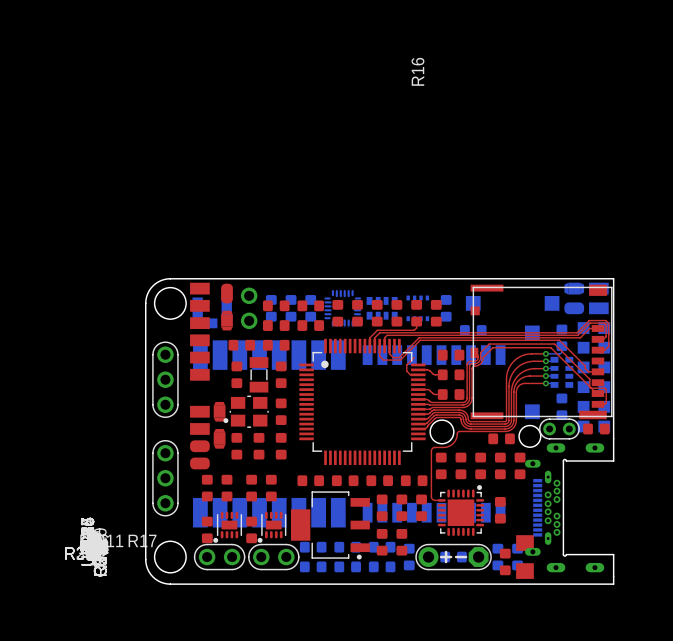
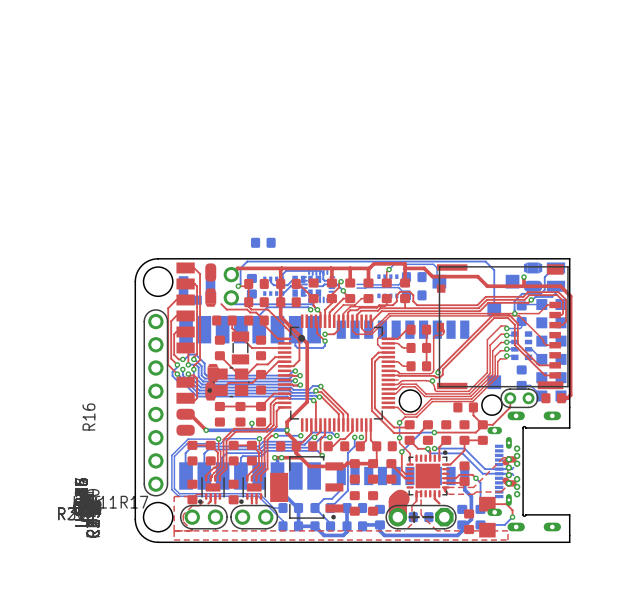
R16 name position: R16 (417, 71) -> R16 (88, 417)
top track: none -> (185, 267) (194, 267) (200, 273) (200, 360) (193, 366) (193, 369)
bottom track: none -> (555, 267) (544, 277) (544, 289) (540, 293) (522, 293) (514, 301) (514, 313)
top track: none -> (281, 268) (280, 316) (307, 343) (307, 401) (287, 422) (287, 433) (295, 441) (296, 446)
top track: none -> (331, 268) (331, 283)
top track: none -> (350, 268) (350, 283)
top track: none -> (369, 268) (237, 268) (229, 274)
top track: none -> (405, 268) (424, 268) (432, 276) (477, 276) (487, 286) (560, 286) (570, 296) (570, 395) (567, 398) (561, 398)
top track: none -> (389, 269) (386, 271) (386, 283)
bottom track: none -> (389, 269) (394, 264) (433, 264) (437, 267) (437, 279)
via: none -> (389, 269)
part footprint: [285, 295, 297, 322] -> [263, 276, 285, 296]
bottom track: none -> (406, 277) (398, 284) (357, 284)
part: none -> (414, 277)
top track: none -> (523, 277) (523, 286)
via: none -> (523, 277)
bottom track: none -> (270, 278) (273, 285) (287, 285) (295, 279)
bottom track: none -> (282, 278) (282, 274) (286, 270) (321, 270) (324, 280) (333, 281) (343, 290)
bottom track: none -> (310, 279) (310, 283) (313, 286) (329, 284)
top track: none -> (341, 281) (339, 287) (331, 294) (331, 303) (325, 310) (325, 321)
via: none -> (341, 281)
top track: none -> (368, 283) (368, 269) (373, 263) (405, 263) (405, 283)
top track: none -> (185, 283) (194, 283) (197, 286) (197, 354) (193, 359)
top track: none -> (296, 283) (299, 283) (313, 298) (313, 305) (320, 312) (320, 321)
top track: none -> (238, 286) (246, 286) (248, 283) (248, 306) (251, 309) (267, 309) (299, 341) (299, 360) (293, 366) (284, 366)
bottom track: none -> (238, 286) (240, 283) (240, 268) (247, 261) (485, 261) (494, 270) (494, 306)
via: none -> (238, 286)
part rotation: 0° (310, 308) -> 90° clockwise (263, 242)
part position: (310, 308) -> (263, 242)
part position: (382, 308) -> (306, 286)
part: (446, 308) -> none
bottom track: none -> (555, 286) (555, 293) (552, 296) (535, 296) (531, 299)
bottom track: none -> (357, 288) (398, 287) (406, 295)
top track: none -> (343, 290) (350, 298) (343, 298) (329, 312) (329, 321)
via: none -> (343, 290)
bottom track: none -> (303, 293) (303, 289) (299, 286) (290, 286) (282, 293)
part: none -> (414, 295)
bottom track: none -> (229, 297) (235, 304) (312, 304) (317, 309)
top track: none -> (368, 298) (361, 298) (355, 305) (343, 305)
top track: none -> (405, 298) (405, 308)
top track: none -> (185, 299) (176, 299) (168, 308) (168, 364) (177, 374)
top track: none -> (531, 299) (528, 302) (488, 302) (479, 311) (381, 311) (370, 321)
via: none -> (531, 299)
top track: none -> (221, 304) (226, 309) (247, 309) (250, 312) (256, 312) (264, 320) (264, 325) (277, 338) (284, 338)
top track: none -> (343, 305) (334, 314)
bottom track: none -> (541, 304) (521, 305)
part: (473, 330) -> none
bottom track: none -> (310, 309) (308, 307) (267, 307) (259, 315) (259, 329)
via: none -> (310, 309)
via: none -> (317, 309)
top track: (374, 337) (379, 332) (577, 332) (589, 320) (605, 320) (608, 323) (608, 346) (605, 350) -> (347, 313) (350, 310) (357, 310) (359, 307) (392, 305) (396, 301) (396, 295) (400, 291) (410, 291) (413, 295) (413, 301) (417, 305) (477, 305) (485, 296) (523, 296) (528, 292) (558, 292) (566, 299) (566, 321) (561, 325)
via: none -> (514, 313)
top track: (384, 339) (387, 335) (578, 335) (590, 323) (604, 323) (606, 336) (603, 339) -> (357, 314) (361, 310) (377, 310) (380, 308) (478, 308) (487, 299) (524, 299) (529, 295) (557, 295) (563, 300) (563, 313) (560, 315)
top track: none -> (185, 315) (176, 315) (171, 321) (171, 358) (177, 364)
top track: none -> (232, 320) (232, 328) (251, 347) (284, 347)
top track: none -> (315, 321) (317, 333) (325, 341)
top track: none -> (338, 321) (338, 329) (334, 334) (325, 334)
top track: (545, 353) (521, 355) (509, 366) (506, 375) (506, 420) (504, 421) -> (506, 326) (501, 326) (487, 339) (487, 372) (468, 391)
bottom track: none -> (295, 329) (295, 345) (297, 347) (322, 347) (325, 341)
top track: none -> (411, 329) (406, 329) (397, 338) (388, 338)
top track: none -> (426, 329) (426, 366)
top track: none -> (185, 331) (176, 331) (174, 334) (174, 354) (178, 359) (182, 359)
via: none -> (325, 334)
top track: (545, 361) (524, 363) (512, 373) (509, 383) (508, 420) (506, 423) (469, 423) (463, 414) (459, 412) (435, 412) (425, 419) -> (506, 334) (501, 334) (490, 345) (490, 373) (469, 393) (425, 393) (416, 384) (401, 384) (395, 389)
via: none -> (325, 341)
top track: (545, 368) (525, 370) (514, 380) (511, 388) (511, 421) (507, 426) (468, 426) (459, 415) (435, 415) (424, 424) -> (506, 342) (501, 342) (492, 350) (492, 374) (470, 396) (424, 396) (415, 386) (402, 386) (393, 393)
top track: none -> (185, 347) (188, 350) (188, 364)
top track: (545, 376) (525, 376) (517, 382) (514, 389) (513, 421) (508, 428) (469, 428) (462, 425) (459, 417) (437, 417) (425, 428) (418, 428) -> none
bottom track: none -> (528, 349) (531, 349) (541, 359)
top track: none -> (506, 350) (500, 350) (495, 356) (495, 375) (471, 399) (431, 399) (415, 414) (404, 414) (397, 407) (388, 407)
part: (165, 379) -> none
top track: none -> (388, 352) (378, 352) (371, 359) (371, 410) (394, 433) (419, 433) (427, 424)
top track: none -> (219, 355) (238, 374) (247, 374) (256, 364) (267, 364) (275, 357) (284, 357)
top track: (545, 383) (523, 383) (518, 386) (516, 421) (510, 429) (459, 431) (455, 440) (450, 445) (432, 448) (431, 497) (434, 500) (441, 500) -> (399, 437) (399, 443) (410, 453) (410, 464)
top track: none -> (388, 357) (379, 357) (374, 361) (374, 408) (394, 427) (406, 427) (409, 424)
top track: none -> (506, 358) (500, 358) (497, 361) (497, 376) (472, 401) (432, 401) (416, 417) (405, 417) (399, 422)
bottom track: none -> (182, 359) (189, 354) (195, 354) (204, 363) (204, 373) (206, 375) (288, 375) (295, 371)
via: none -> (182, 359)
bottom track: none -> (193, 359) (201, 366) (201, 375) (204, 378) (289, 378) (292, 375) (300, 375)
via: none -> (193, 359)
top track: none -> (284, 361) (278, 361) (265, 374) (261, 374) (252, 382) (228, 382) (221, 390)
bottom track: none -> (177, 364) (172, 372) (172, 376) (197, 396) (287, 396) (289, 398) (311, 398) (313, 400)
via: none -> (177, 364)
bottom track: none -> (188, 364) (195, 364) (198, 367) (198, 376) (203, 381) (295, 380)
via: none -> (188, 364)
top track: (596, 393) (550, 347) (492, 347) (483, 357) (480, 363) (472, 367) (471, 399) (469, 404) (463, 407) (433, 407) (428, 409) -> (553, 365) (539, 365) (517, 343) (517, 323) (509, 315) (492, 315) (438, 370) (438, 372)
bottom track: none -> (182, 369) (182, 375) (199, 390) (289, 390) (292, 392) (310, 392)
via: none -> (182, 369)
bottom track: none -> (193, 369) (193, 376) (202, 384) (300, 385)
via: none -> (193, 369)
via: none -> (295, 371)
part: none -> (213, 373)
via: none -> (438, 372)
via: none -> (177, 374)
top track: none -> (188, 374) (197, 378) (197, 398) (194, 400) (185, 400)
bottom track: none -> (188, 374) (200, 387) (291, 387) (293, 389) (309, 389) (312, 386) (320, 386)
via: none -> (188, 374)
top track: none -> (284, 375) (300, 375)
via: none -> (300, 375)
top track: (428, 404) (462, 405) (467, 403) (469, 398) (469, 365) (478, 361) (480, 352) (489, 344) (554, 344) (589, 379) (591, 388) (606, 389) (606, 403) (597, 404) -> (397, 375) (440, 377) (442, 374) (442, 369) (494, 318) (508, 318) (514, 324) (514, 345) (545, 375) (555, 375)
bottom track: none -> (179, 376) (198, 393) (288, 393) (290, 395) (311, 395)
via: none -> (295, 380)
via: none -> (432, 380)
part: (219, 411) -> none
top track: none -> (284, 384) (300, 385)
via: none -> (300, 385)
bottom track: none -> (521, 385) (530, 385) (541, 395)
top track: none -> (320, 386) (347, 414) (347, 424)
via: none -> (320, 386)
part: none -> (210, 391)
top track: none -> (315, 390) (321, 392) (343, 414) (343, 424)
bottom track: none -> (315, 390) (310, 392)
via: none -> (315, 390)
top track: none -> (284, 393) (273, 393) (261, 406) (219, 406)
bottom track: none -> (311, 395) (319, 397)
top track: none -> (319, 397) (338, 414) (338, 424)
via: none -> (319, 397)
top track: none -> (284, 398) (276, 398) (270, 403) (270, 424) (266, 428) (234, 428) (223, 439) (223, 467) (215, 475) (215, 478)
top track: none -> (510, 398) (510, 407) (492, 424) (482, 424)
top track: none -> (313, 400) (315, 402) (315, 424)
via: none -> (313, 400)
part: none -> (155, 402)
top track: none -> (284, 402) (276, 402) (273, 405) (273, 425) (267, 431) (235, 431) (226, 440) (226, 468) (219, 475) (219, 478)
part: (219, 438) -> none
top track: none -> (284, 407) (280, 407) (276, 411) (276, 426) (264, 438) (264, 467) (256, 475) (256, 478)
top track: none -> (473, 409) (473, 415) (482, 424)
top track: none -> (185, 416) (192, 416) (206, 430)
bottom track: none -> (399, 422) (399, 437)
via: none -> (399, 422)
bottom track: none -> (251, 423) (251, 430) (287, 430)
via: none -> (251, 423)
top track: none -> (311, 424) (311, 433) (296, 446)
top track: none -> (320, 424) (320, 431) (314, 437)
top track: none -> (325, 424) (325, 434) (320, 439) (320, 453) (322, 455)
top track: none -> (352, 424) (352, 431) (344, 439) (340, 439) (333, 446) (328, 446)
top track: none -> (366, 424) (366, 440) (360, 446)
top track: none -> (370, 424) (370, 440) (376, 446) (376, 460) (373, 463) (347, 463) (344, 465) (309, 466) (296, 453) (296, 446)
top track: none -> (482, 424) (475, 432) (434, 432)
bottom track: none -> (206, 430) (251, 430)
via: none -> (206, 430)
via: none -> (287, 430)
bottom track: none -> (434, 432) (421, 432) (401, 451)
via: none -> (434, 432)
top track: none -> (275, 435) (271, 435) (267, 439) (267, 468) (261, 475) (261, 478)
bottom track: none -> (275, 435) (300, 435)
via: none -> (275, 435)
via: none -> (300, 435)
bottom track: none -> (336, 435) (331, 432) (312, 432) (303, 441) (263, 441) (258, 446) (192, 446) (185, 453) (186, 476)
via: none -> (336, 435)
bottom track: none -> (314, 437) (311, 437) (304, 444) (264, 444) (259, 449) (208, 449) (204, 453) (204, 476)
via: none -> (314, 437)
bottom track: none -> (329, 437) (321, 437) (311, 447) (265, 447) (260, 453) (226, 453) (222, 457) (222, 476)
via: none -> (329, 437)
bottom track: none -> (354, 437) (354, 446) (347, 453) (347, 490) (330, 508)
via: none -> (354, 437)
via: none -> (361, 437)
via: none -> (399, 437)
top track: none -> (259, 438) (261, 466) (258, 470)
bottom track: none -> (259, 438) (225, 438) (220, 443) (187, 443) (174, 456) (174, 488) (179, 493) (259, 493) (273, 508) (282, 508)
via: none -> (259, 438)
top track: none -> (218, 439) (220, 466) (214, 473)
bottom track: none -> (218, 439) (188, 439) (171, 455) (171, 489) (178, 496) (258, 496) (282, 520) (282, 526)
via: none -> (218, 439)
top track: none -> (409, 440) (418, 448) (427, 448) (430, 451) (430, 458)
top track: none -> (446, 440) (439, 447) (439, 458)
top track: none -> (482, 440) (464, 440) (464, 450) (450, 464) (445, 464)
part: (165, 478) -> none
top track: none -> (192, 445) (210, 445) (217, 452) (217, 465) (206, 475) (206, 478)
top track: none -> (233, 445) (251, 445) (259, 452) (259, 465) (247, 476) (247, 478)
bottom track: none -> (427, 448) (430, 453) (462, 453) (482, 473) (513, 475)
via: none -> (427, 448)
bottom track: none -> (434, 448) (464, 448) (485, 469) (513, 467)
via: none -> (434, 448)
top track: none -> (401, 451) (401, 470) (405, 473) (410, 473)
via: none -> (401, 451)
bottom track: none -> (322, 455) (317, 450) (266, 450) (261, 456) (242, 456) (240, 457) (240, 476)
via: none -> (322, 455)
top track: none -> (274, 457) (300, 457)
via: none -> (274, 457)
via: none -> (281, 457)
top zone outline: none -> (503, 457) (507, 457) (507, 485) (501, 492) (448, 494) (443, 489) (443, 487) (473, 487) (503, 457)
top track: none -> (513, 459) (508, 459) (505, 462)
bottom track: none -> (277, 460) (277, 487) (298, 508) (298, 526) (315, 526) (324, 535) (343, 535) (347, 531) (347, 508)
top track: none -> (391, 463) (405, 478) (410, 478)
top track: none -> (257, 470) (251, 478)
top track: none -> (214, 473) (210, 478)
bottom track: none -> (341, 476) (341, 489) (331, 498) (324, 498) (315, 508) (330, 523) (330, 526)
bottom track: none -> (464, 476) (464, 489) (471, 496) (471, 519) (465, 524) (462, 524) (462, 530) (457, 535) (384, 535) (379, 530) (379, 524) (362, 526)
top track: none -> (445, 478) (456, 478) (459, 474) (472, 474) (475, 478)
bottom track: none -> (475, 478) (480, 482) (480, 509)
via: none -> (475, 478)
top track: none -> (505, 480) (508, 483) (513, 483)
top track: none -> (464, 481) (445, 482)
top track: none -> (445, 487) (446, 492)
top track: none -> (416, 493) (416, 501)
top track: none -> (434, 493) (434, 498) (439, 503)
top track: none -> (210, 496) (208, 503)
top track: none -> (215, 496) (215, 503)
top track: none -> (251, 496) (251, 503)
top track: none -> (256, 496) (256, 503)
top track: none -> (400, 498) (397, 501) (397, 517)
top track: none -> (487, 504) (506, 504) (512, 510) (512, 517)
bottom track: none -> (512, 517) (504, 524) (480, 524)
via: none -> (512, 517)
top zone outline: none -> (174, 530) (405, 530) (411, 524) (411, 505) (416, 501) (416, 492) (421, 492) (421, 514) (437, 530) (507, 530) (507, 540) (174, 540) (174, 496) (206, 494) (206, 498) (199, 505) (192, 505) (183, 514) (183, 521) (192, 530)

